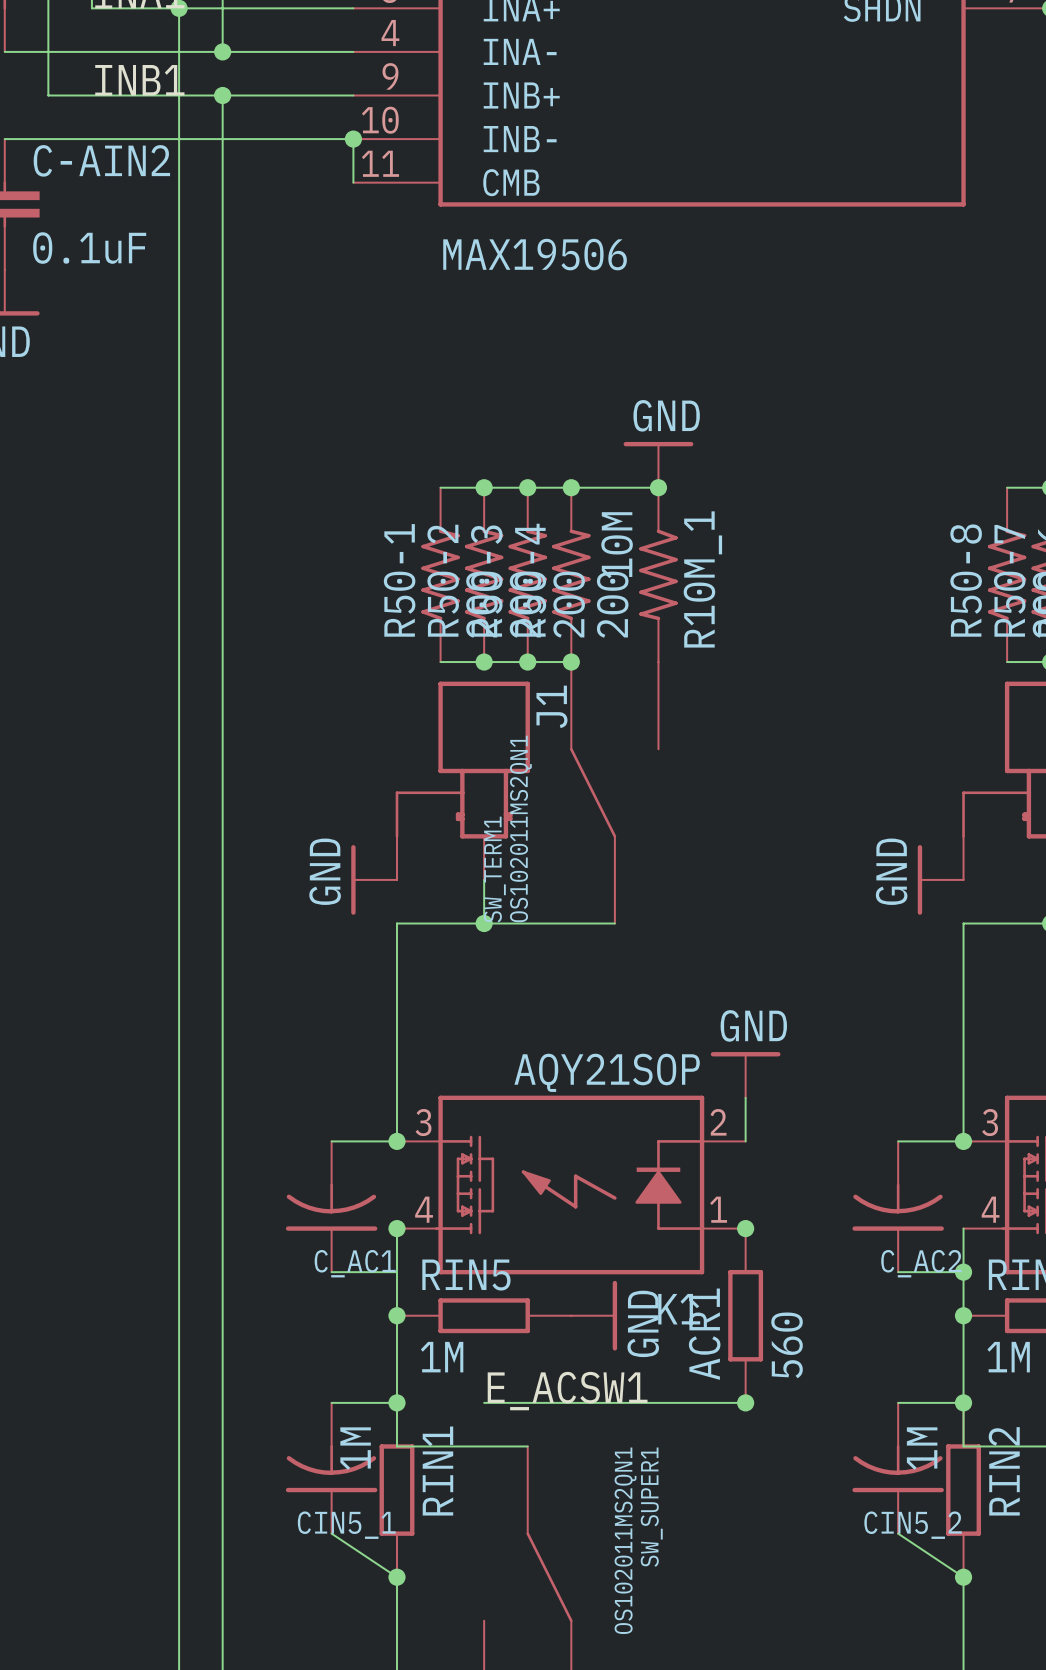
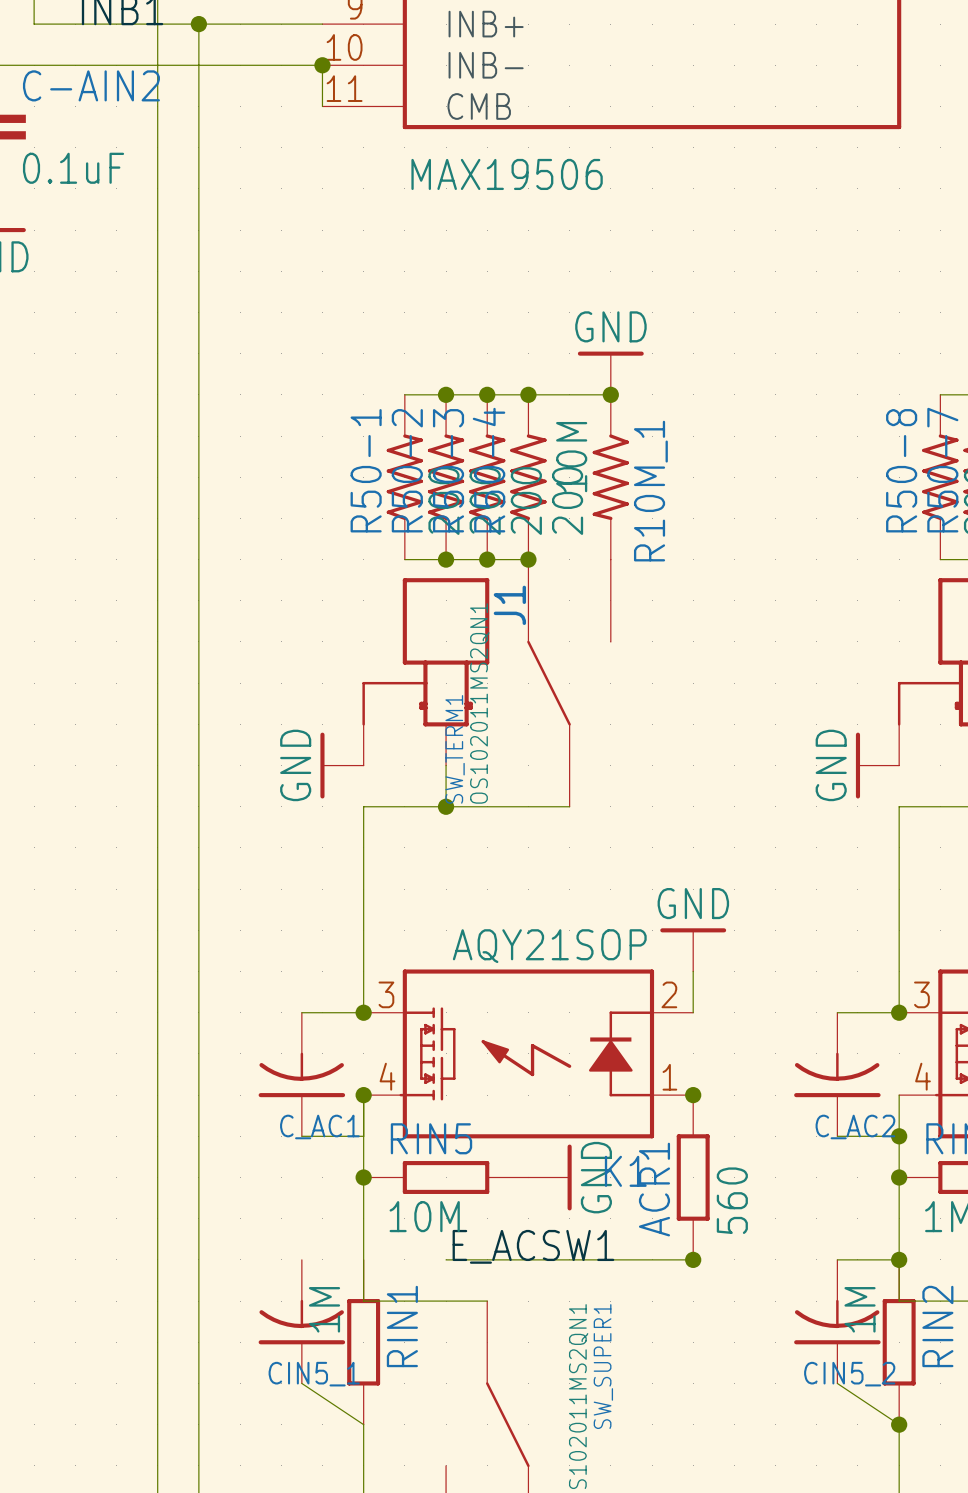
RIN5 value: 1M (442, 1357) -> 10M (424, 1216)
wire: (331, 1402) (396, 1402) -> none
junction: (396, 1402) -> none
junction: (396, 1577) -> none

